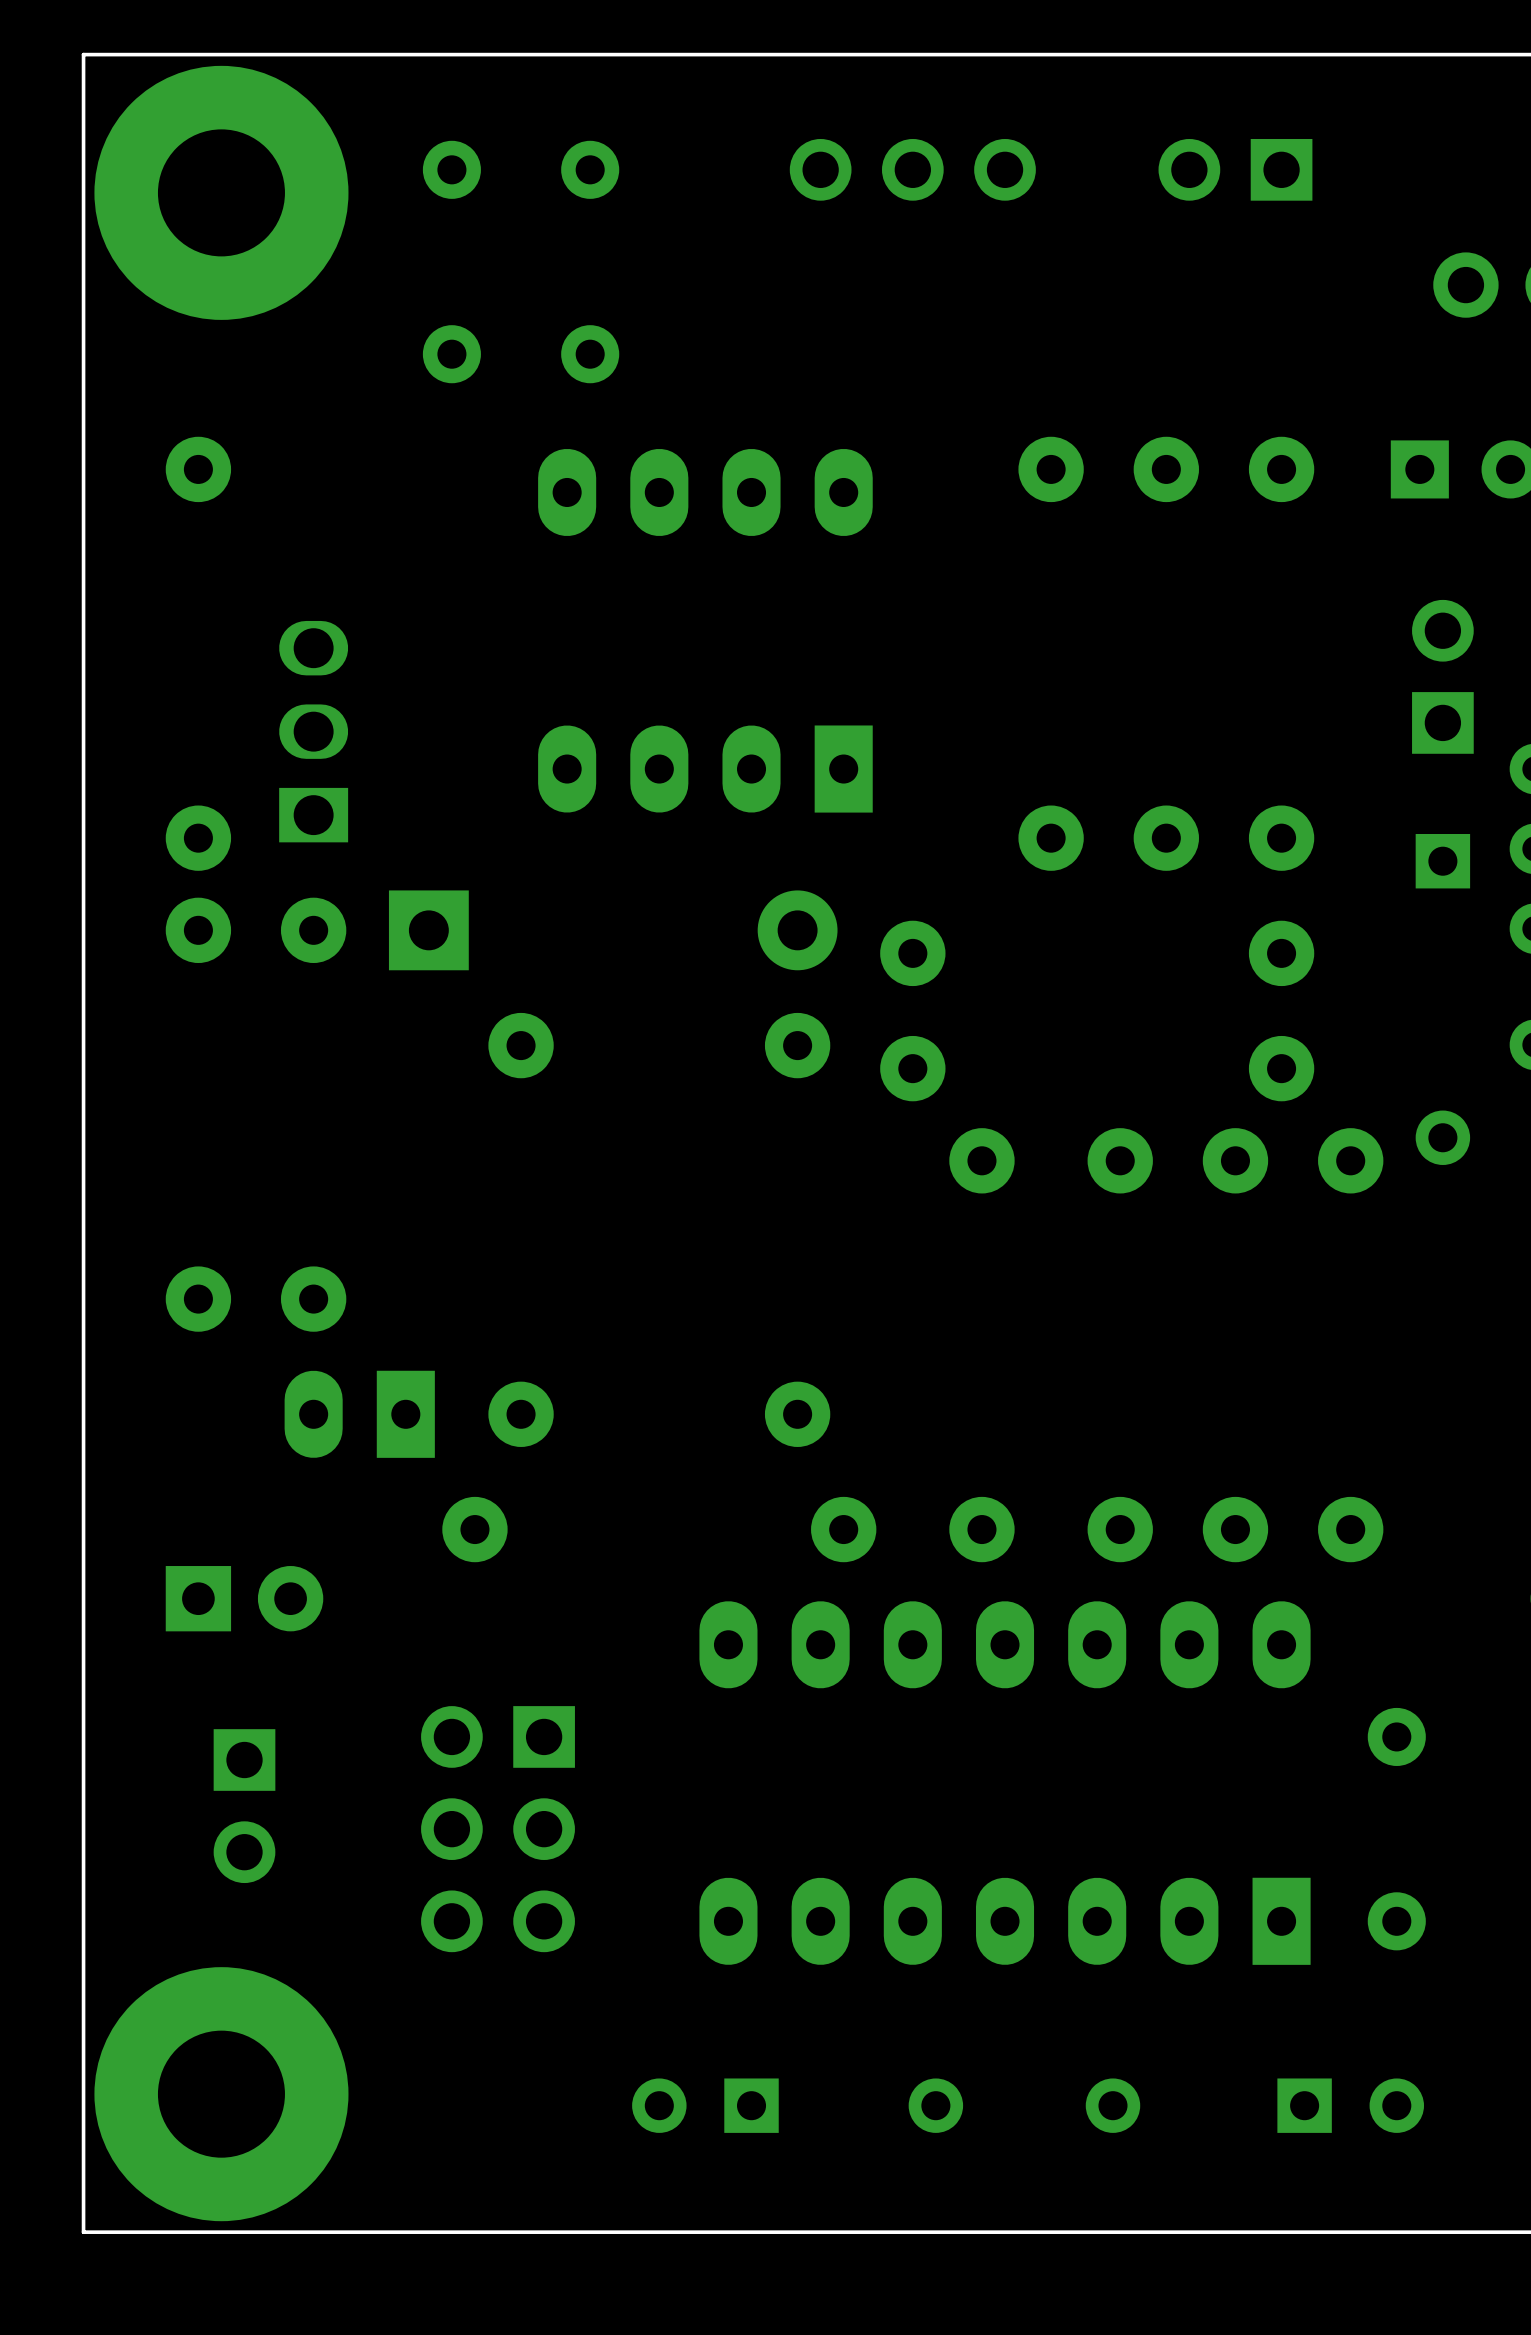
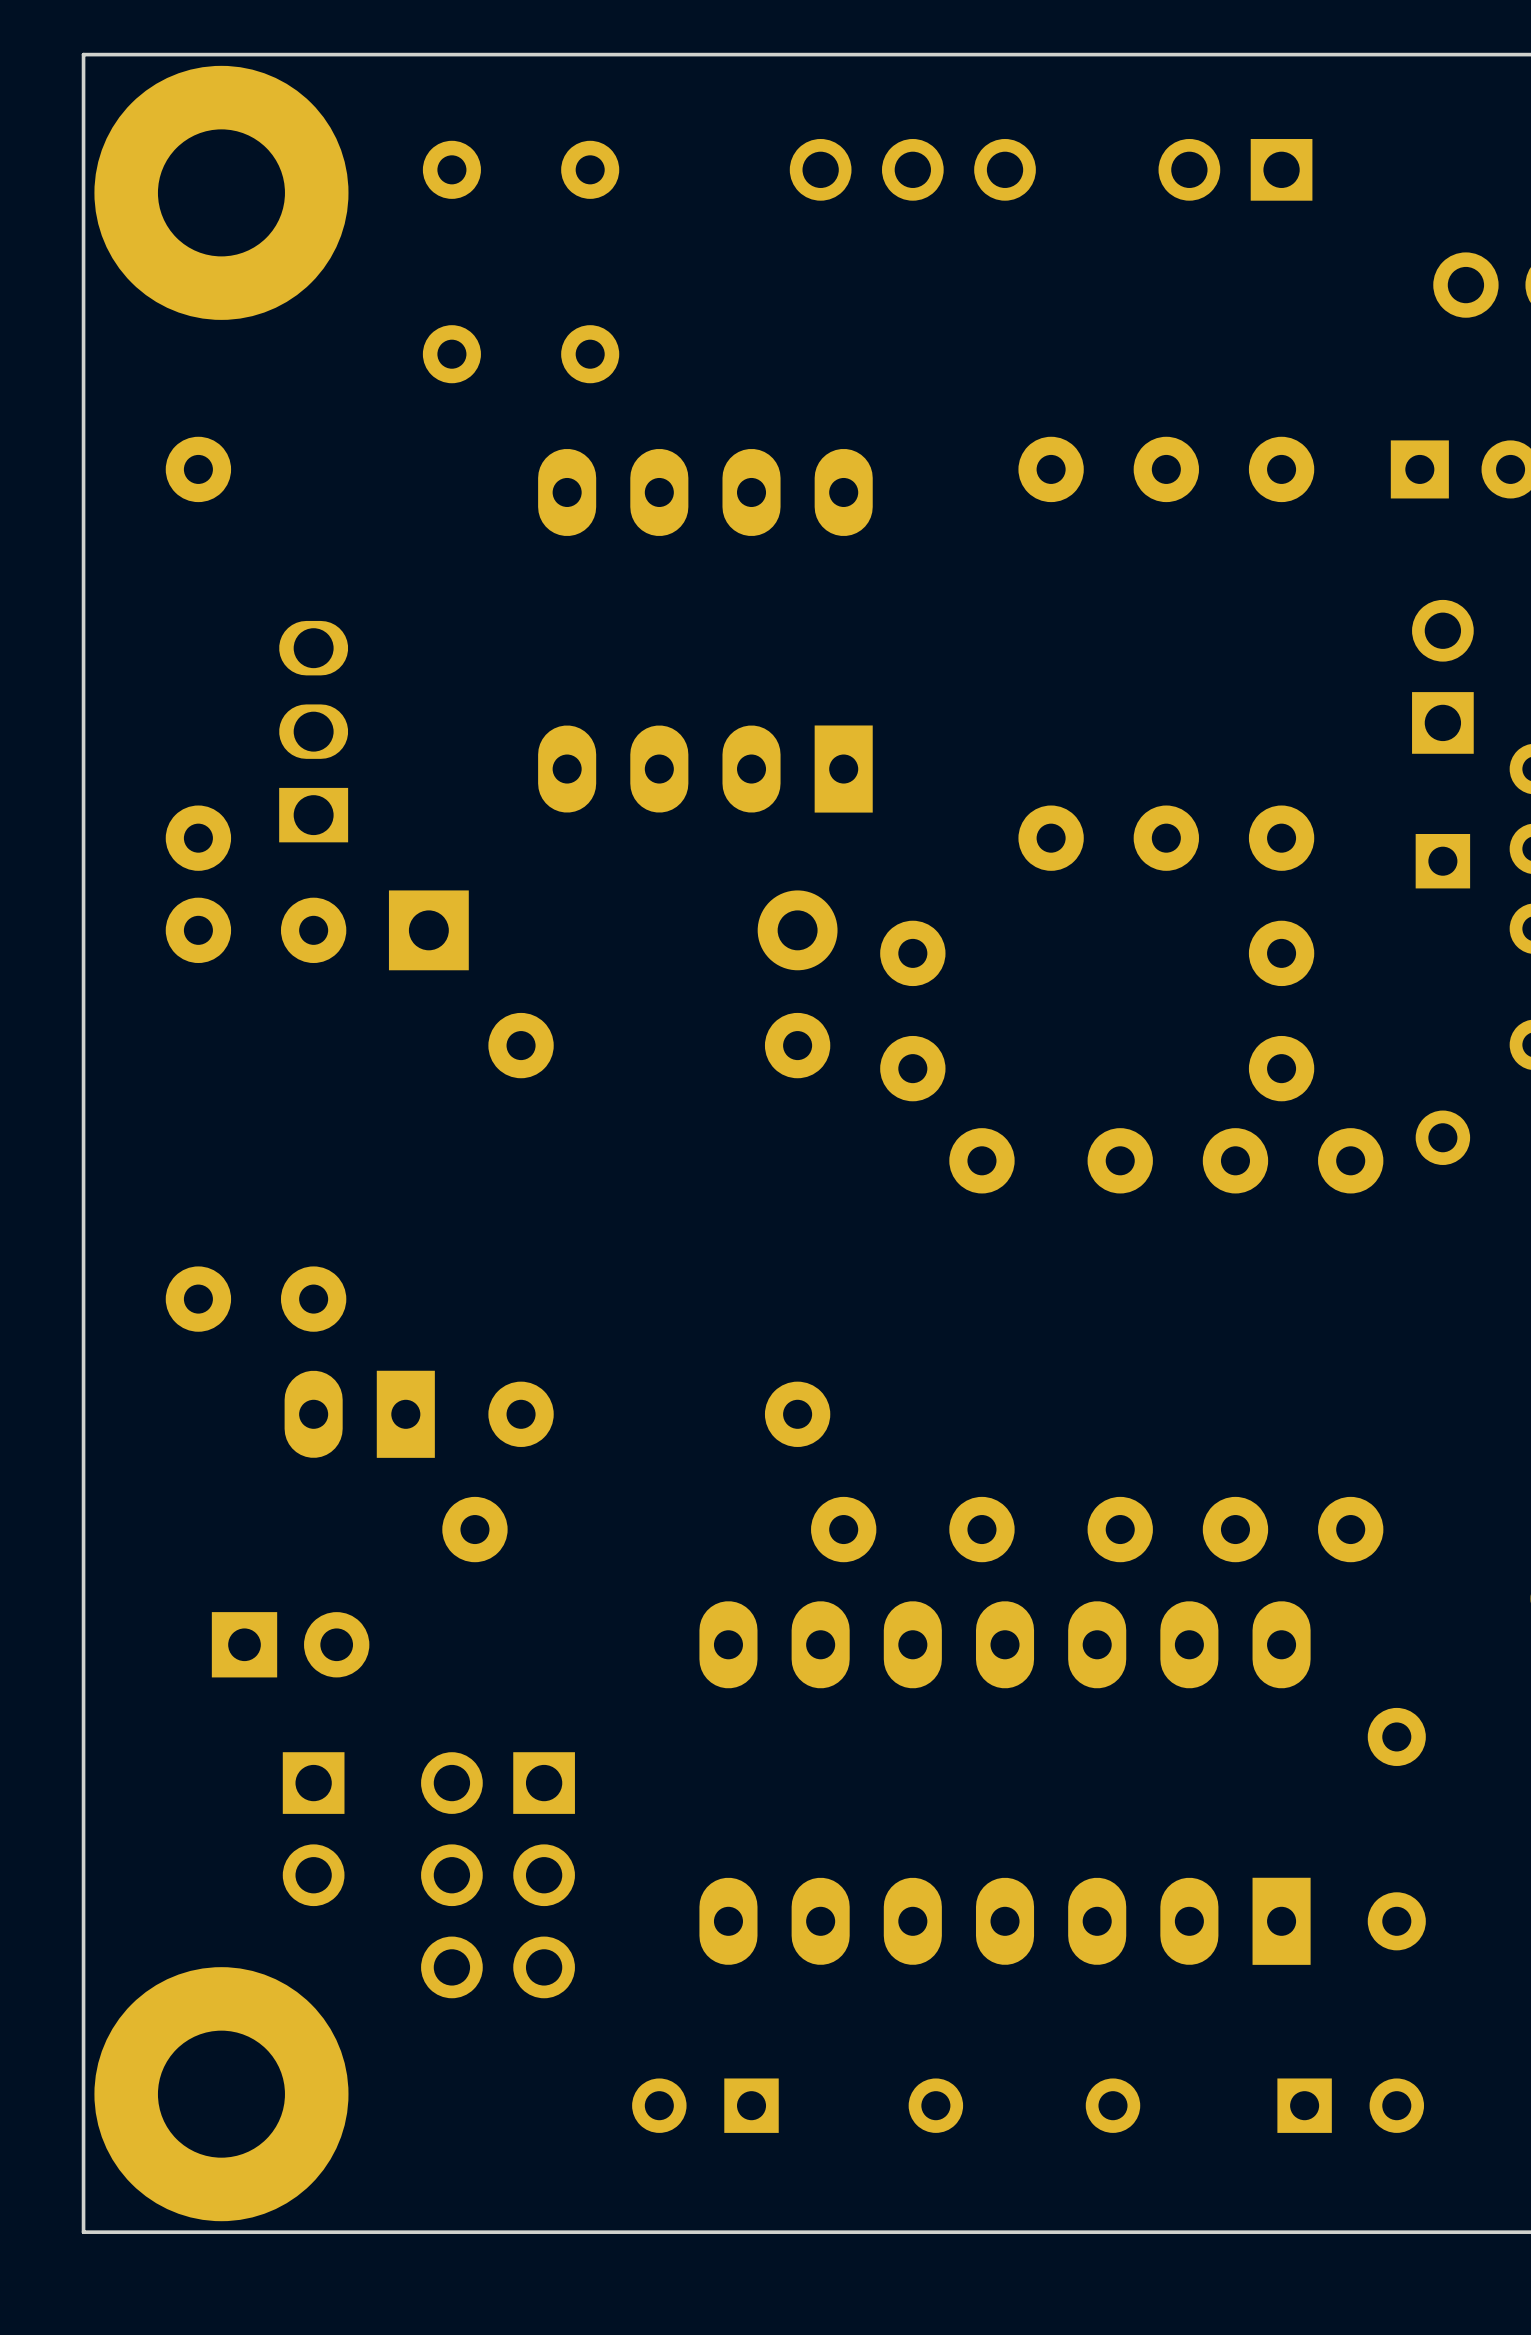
part position: (244, 1598) -> (290, 1644)
part position: (244, 1806) -> (313, 1829)
part position: (498, 1829) -> (498, 1875)

